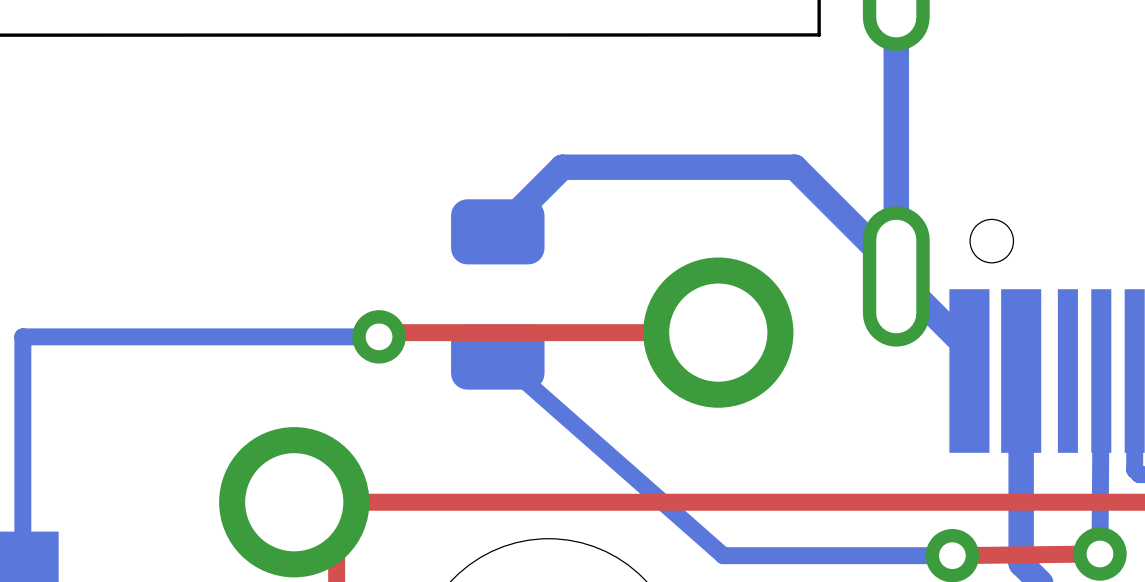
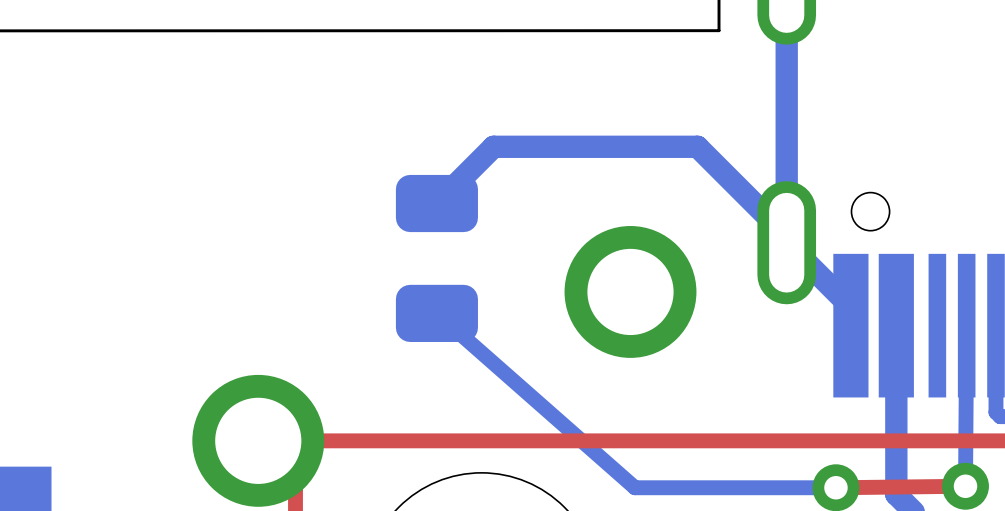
top track: (718, 332) (383, 332) (379, 336) -> none
bottom track: (379, 336) (22, 336) (22, 557) (18, 561) -> none
via: (379, 336) -> none

